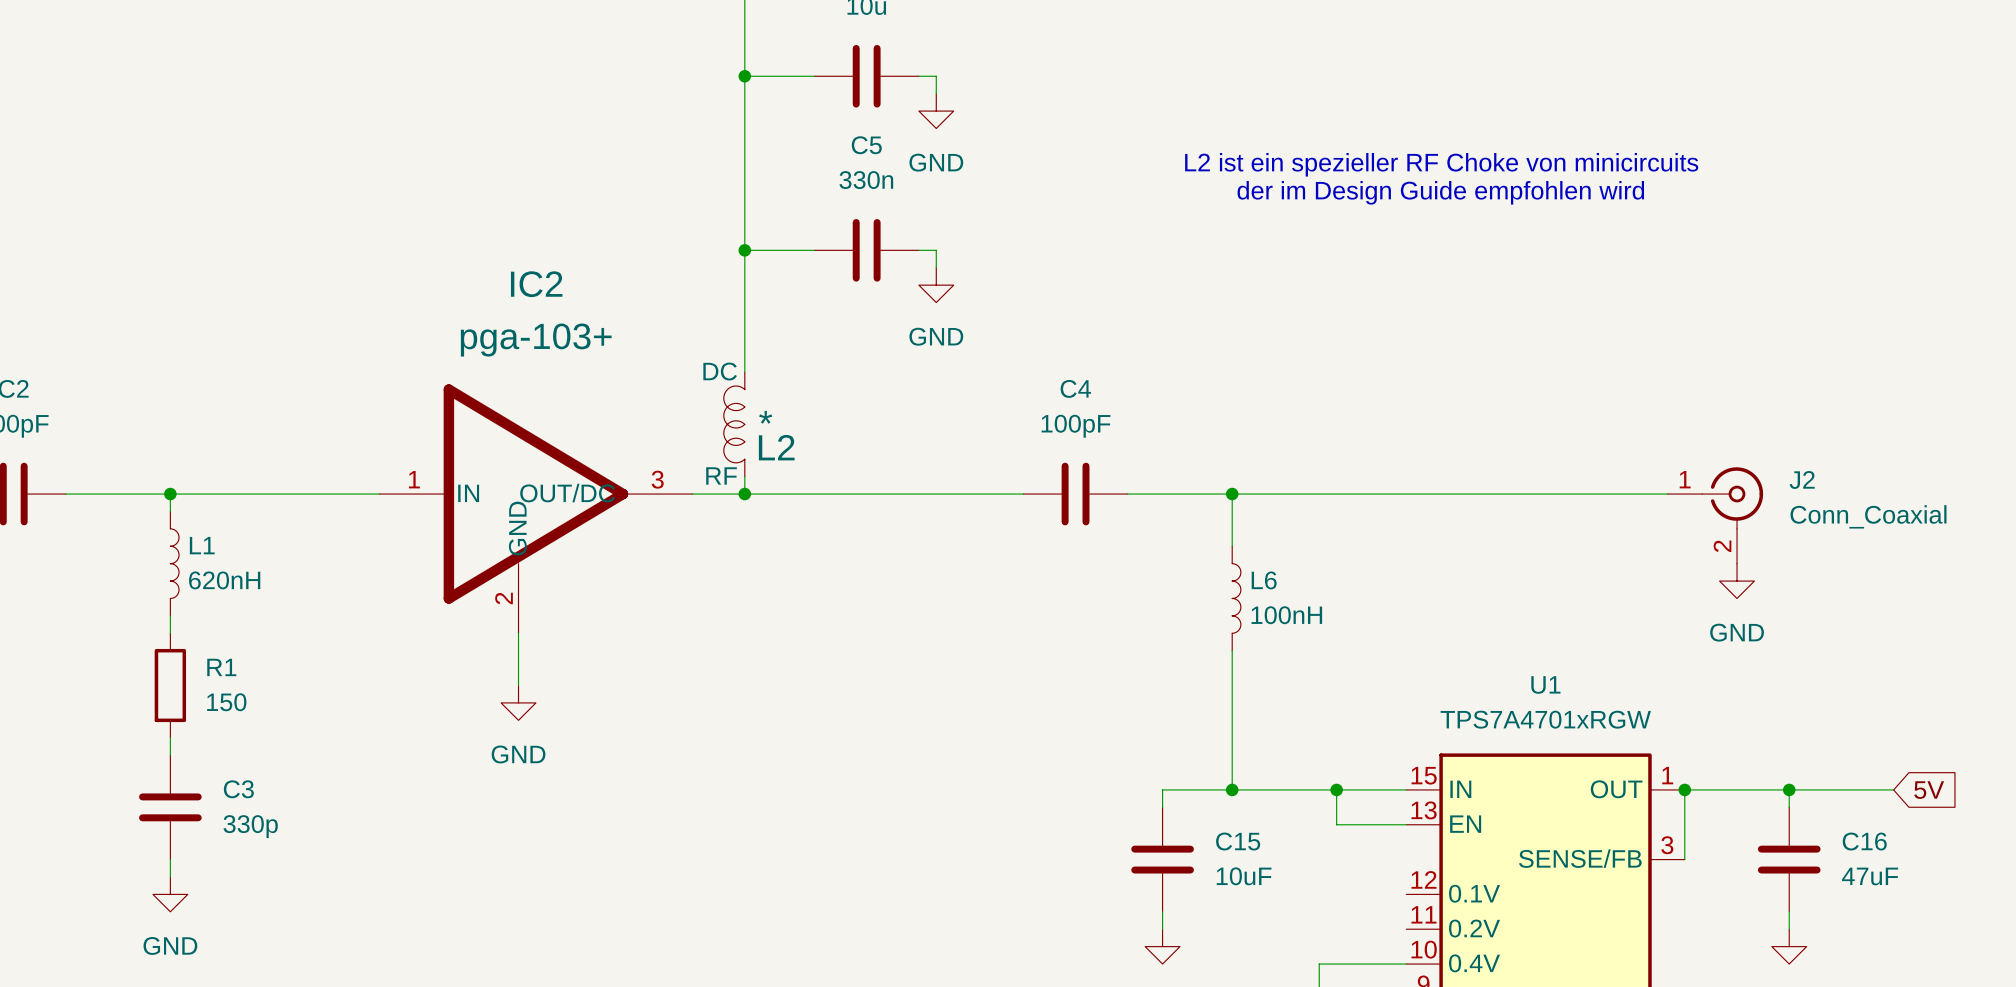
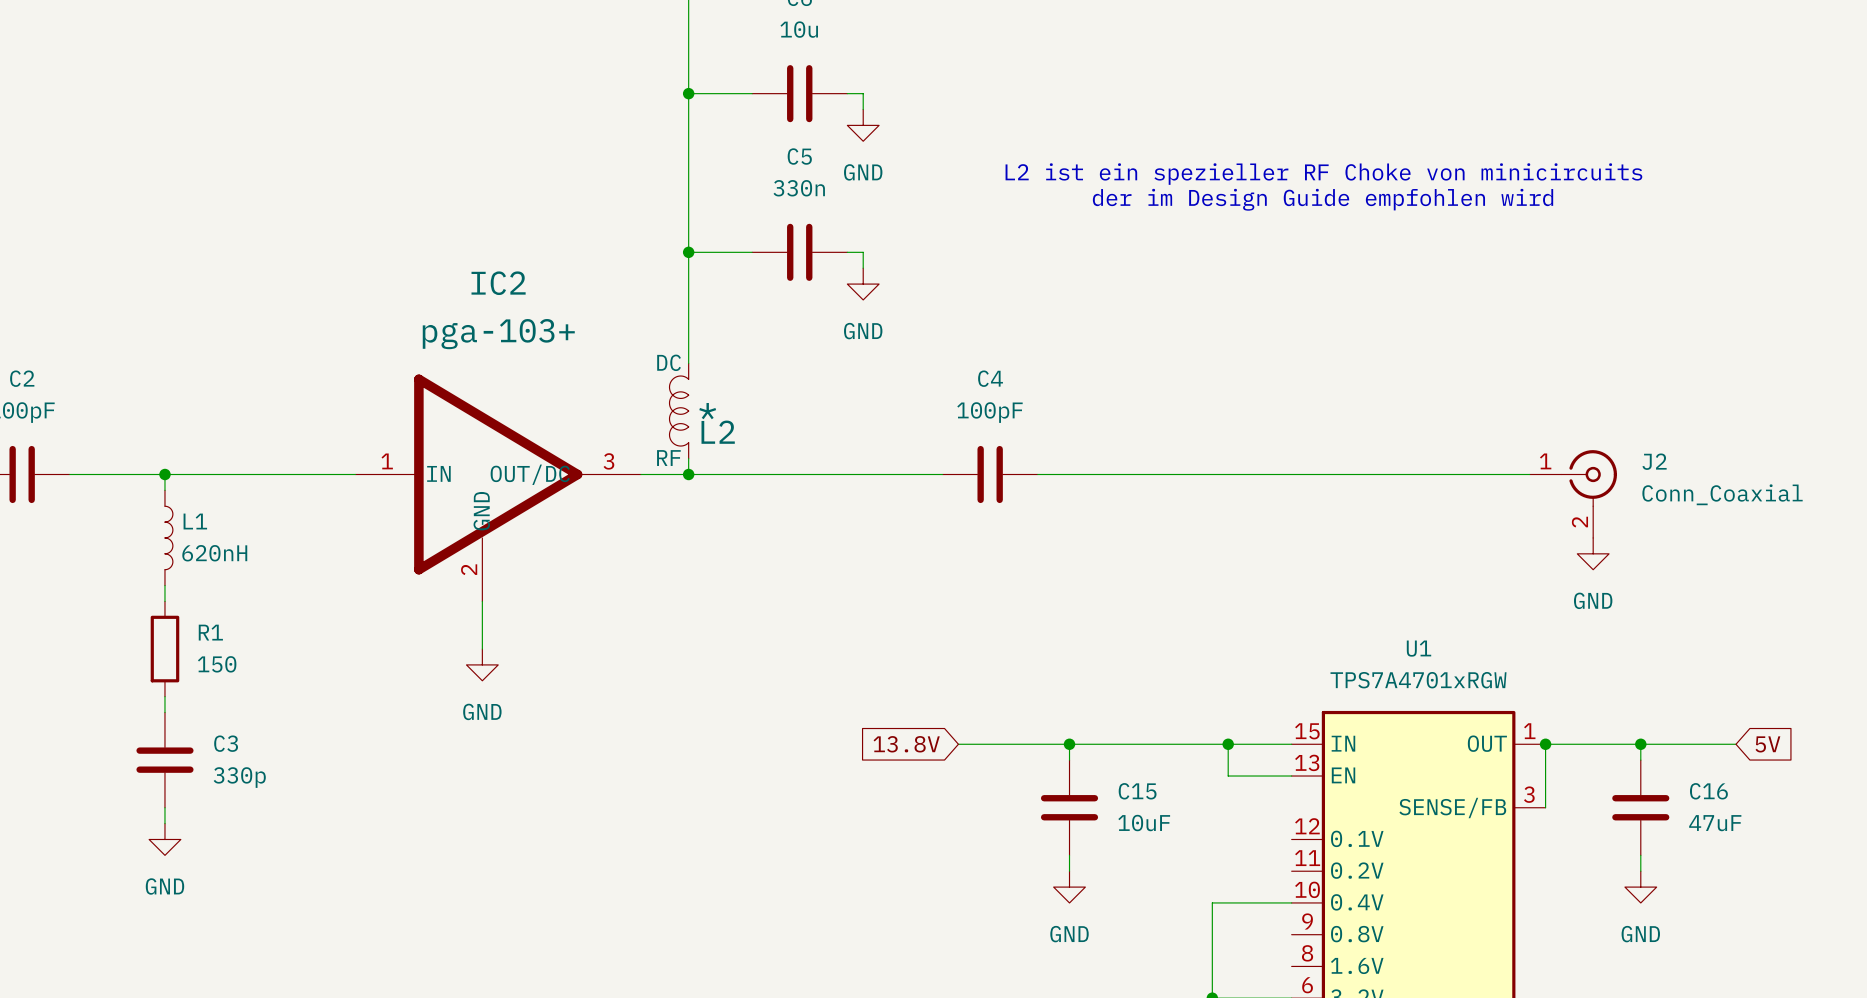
wire: (1232, 494) (1232, 546) -> none
junction: (1232, 494) -> none
L6: 100nH (1236, 598) -> none
wire: (1232, 650) (1232, 789) -> none
global label: none -> 13.8V (906, 744)
wire: none -> (958, 744) (1069, 744)
junction position: (1232, 789) -> (1069, 744)

